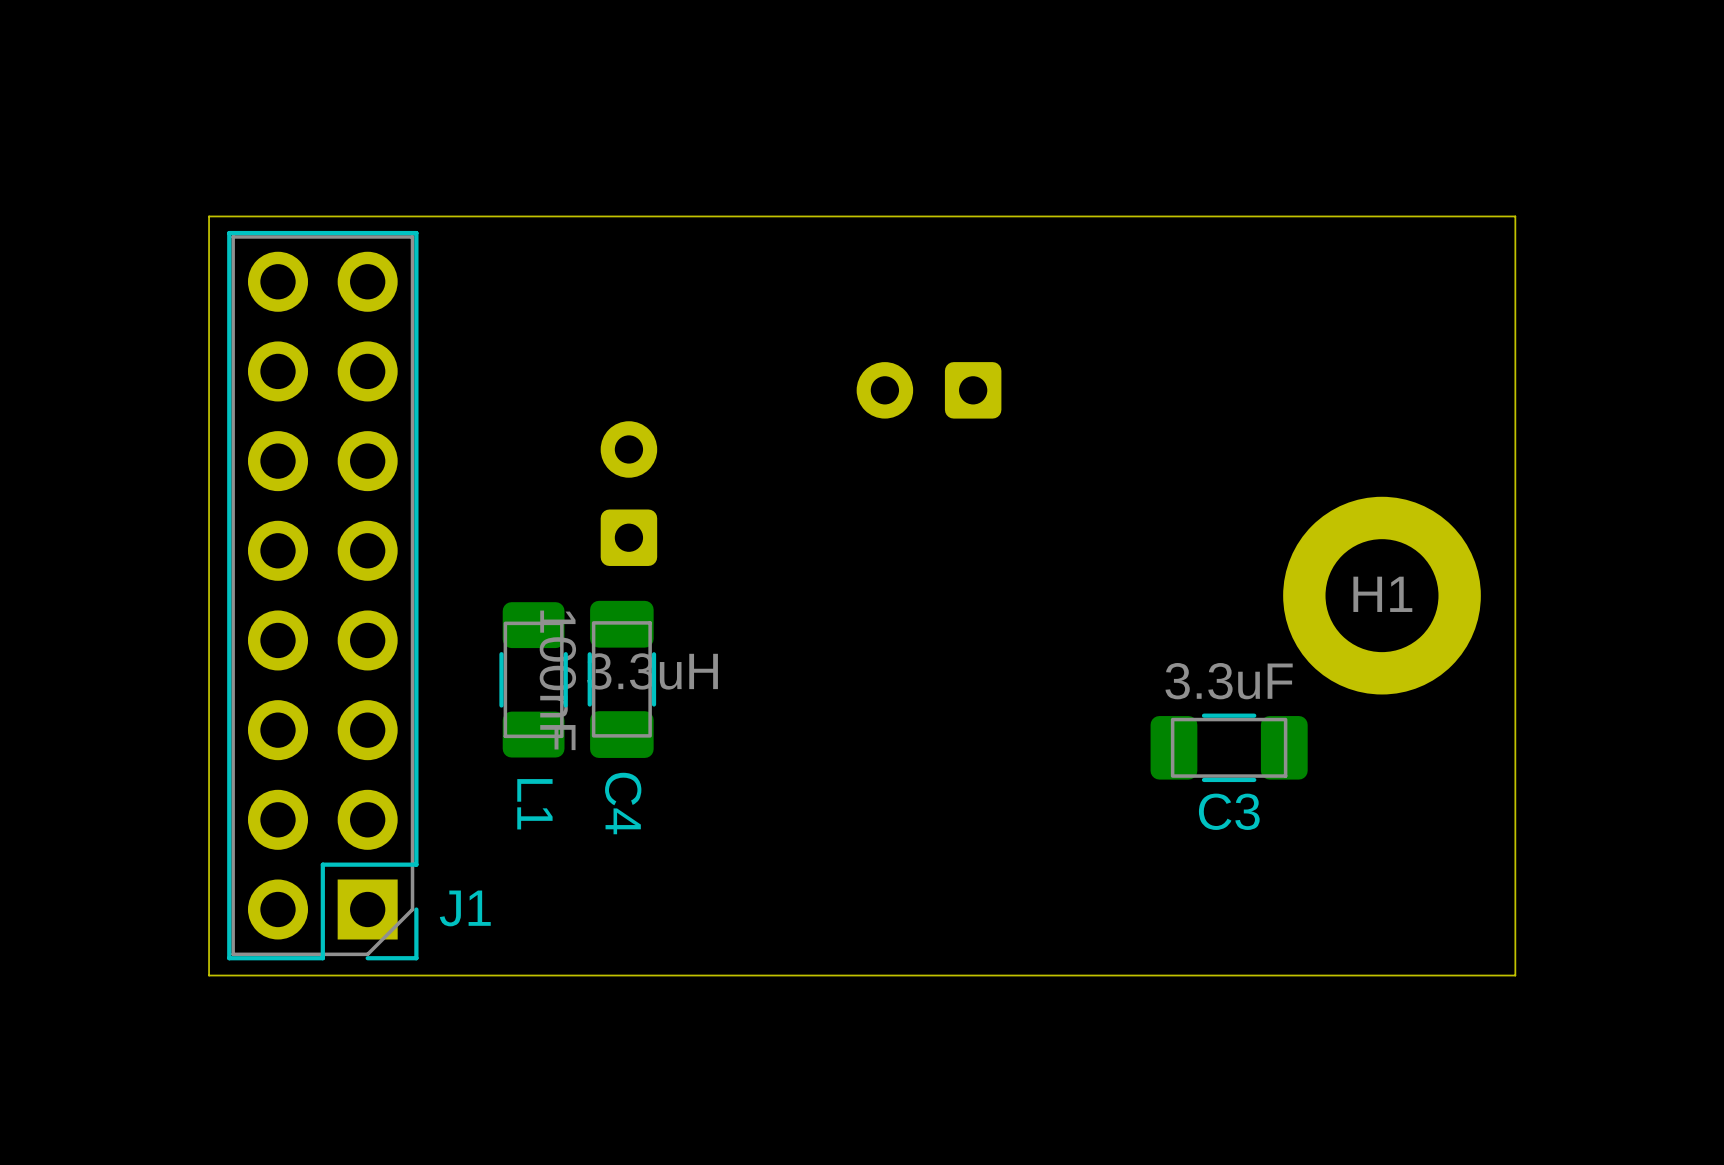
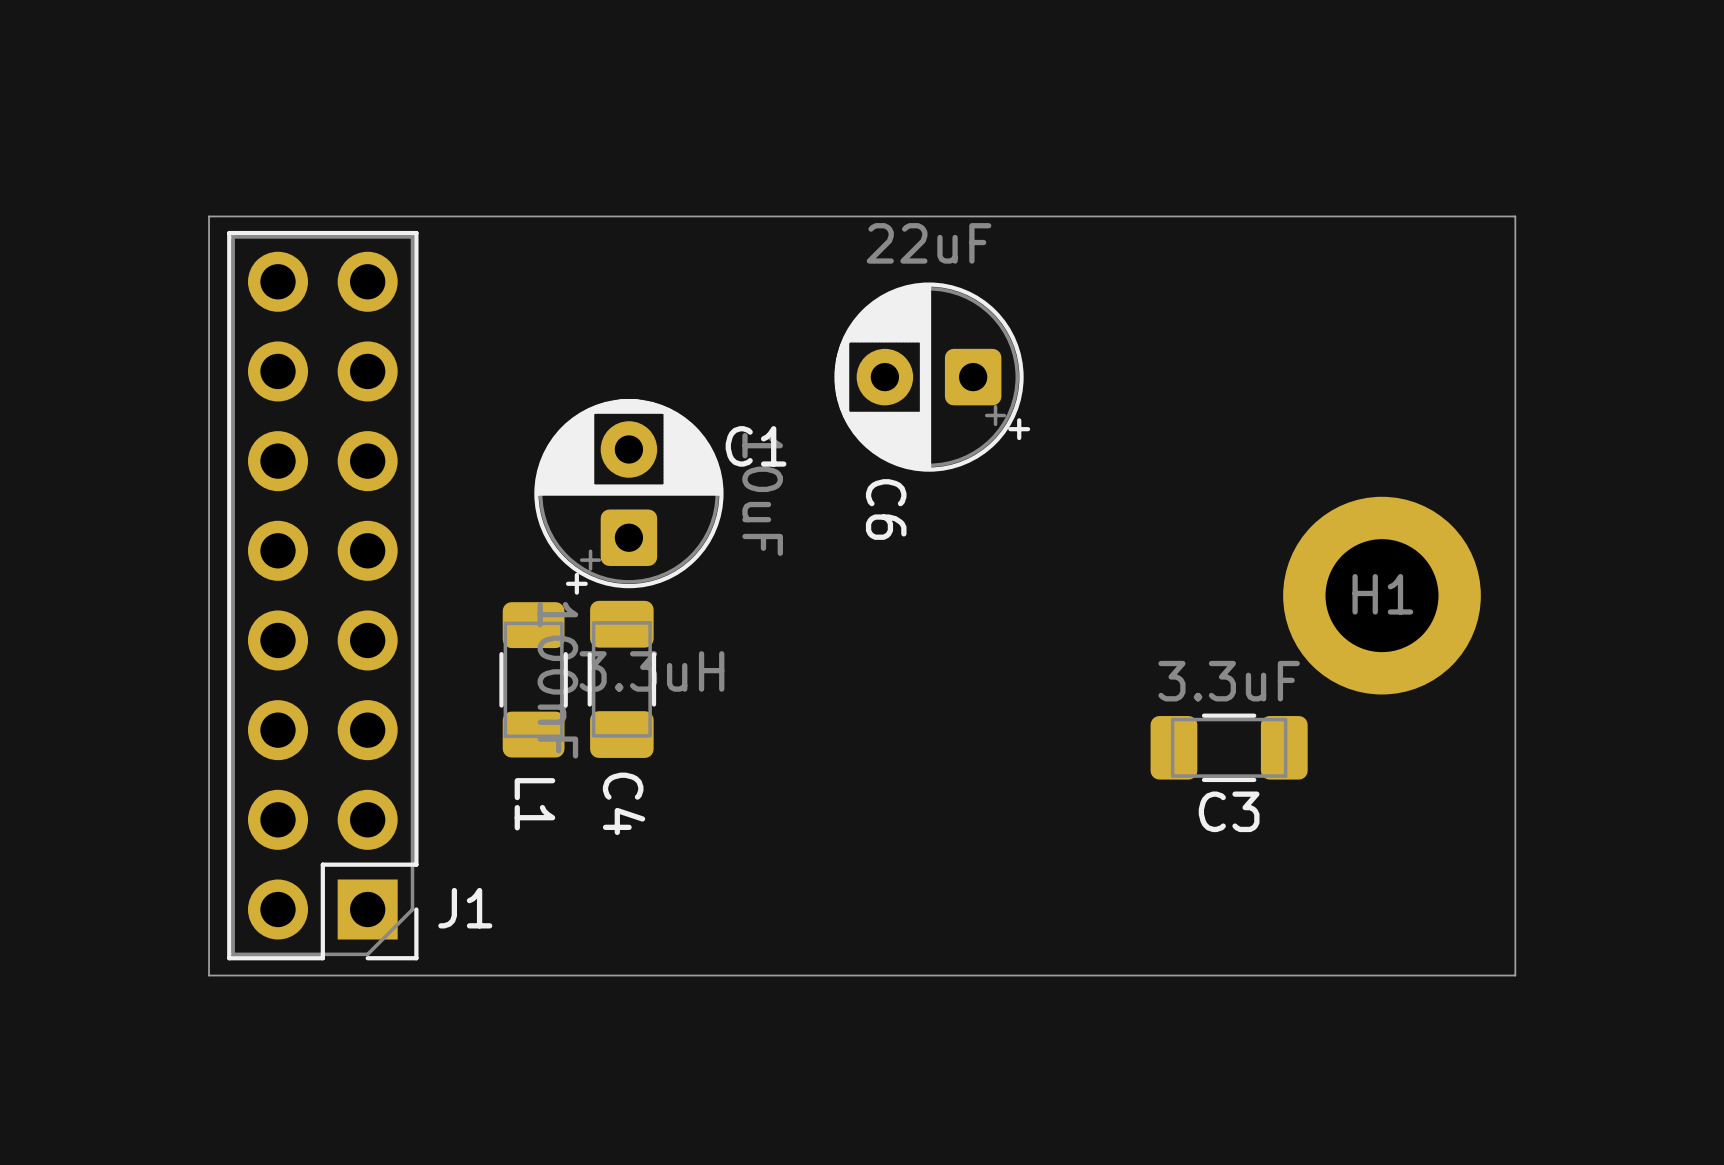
C6 side: top (929, 390) -> bottom (932, 377)
C1 side: top (628, 493) -> bottom (628, 496)

